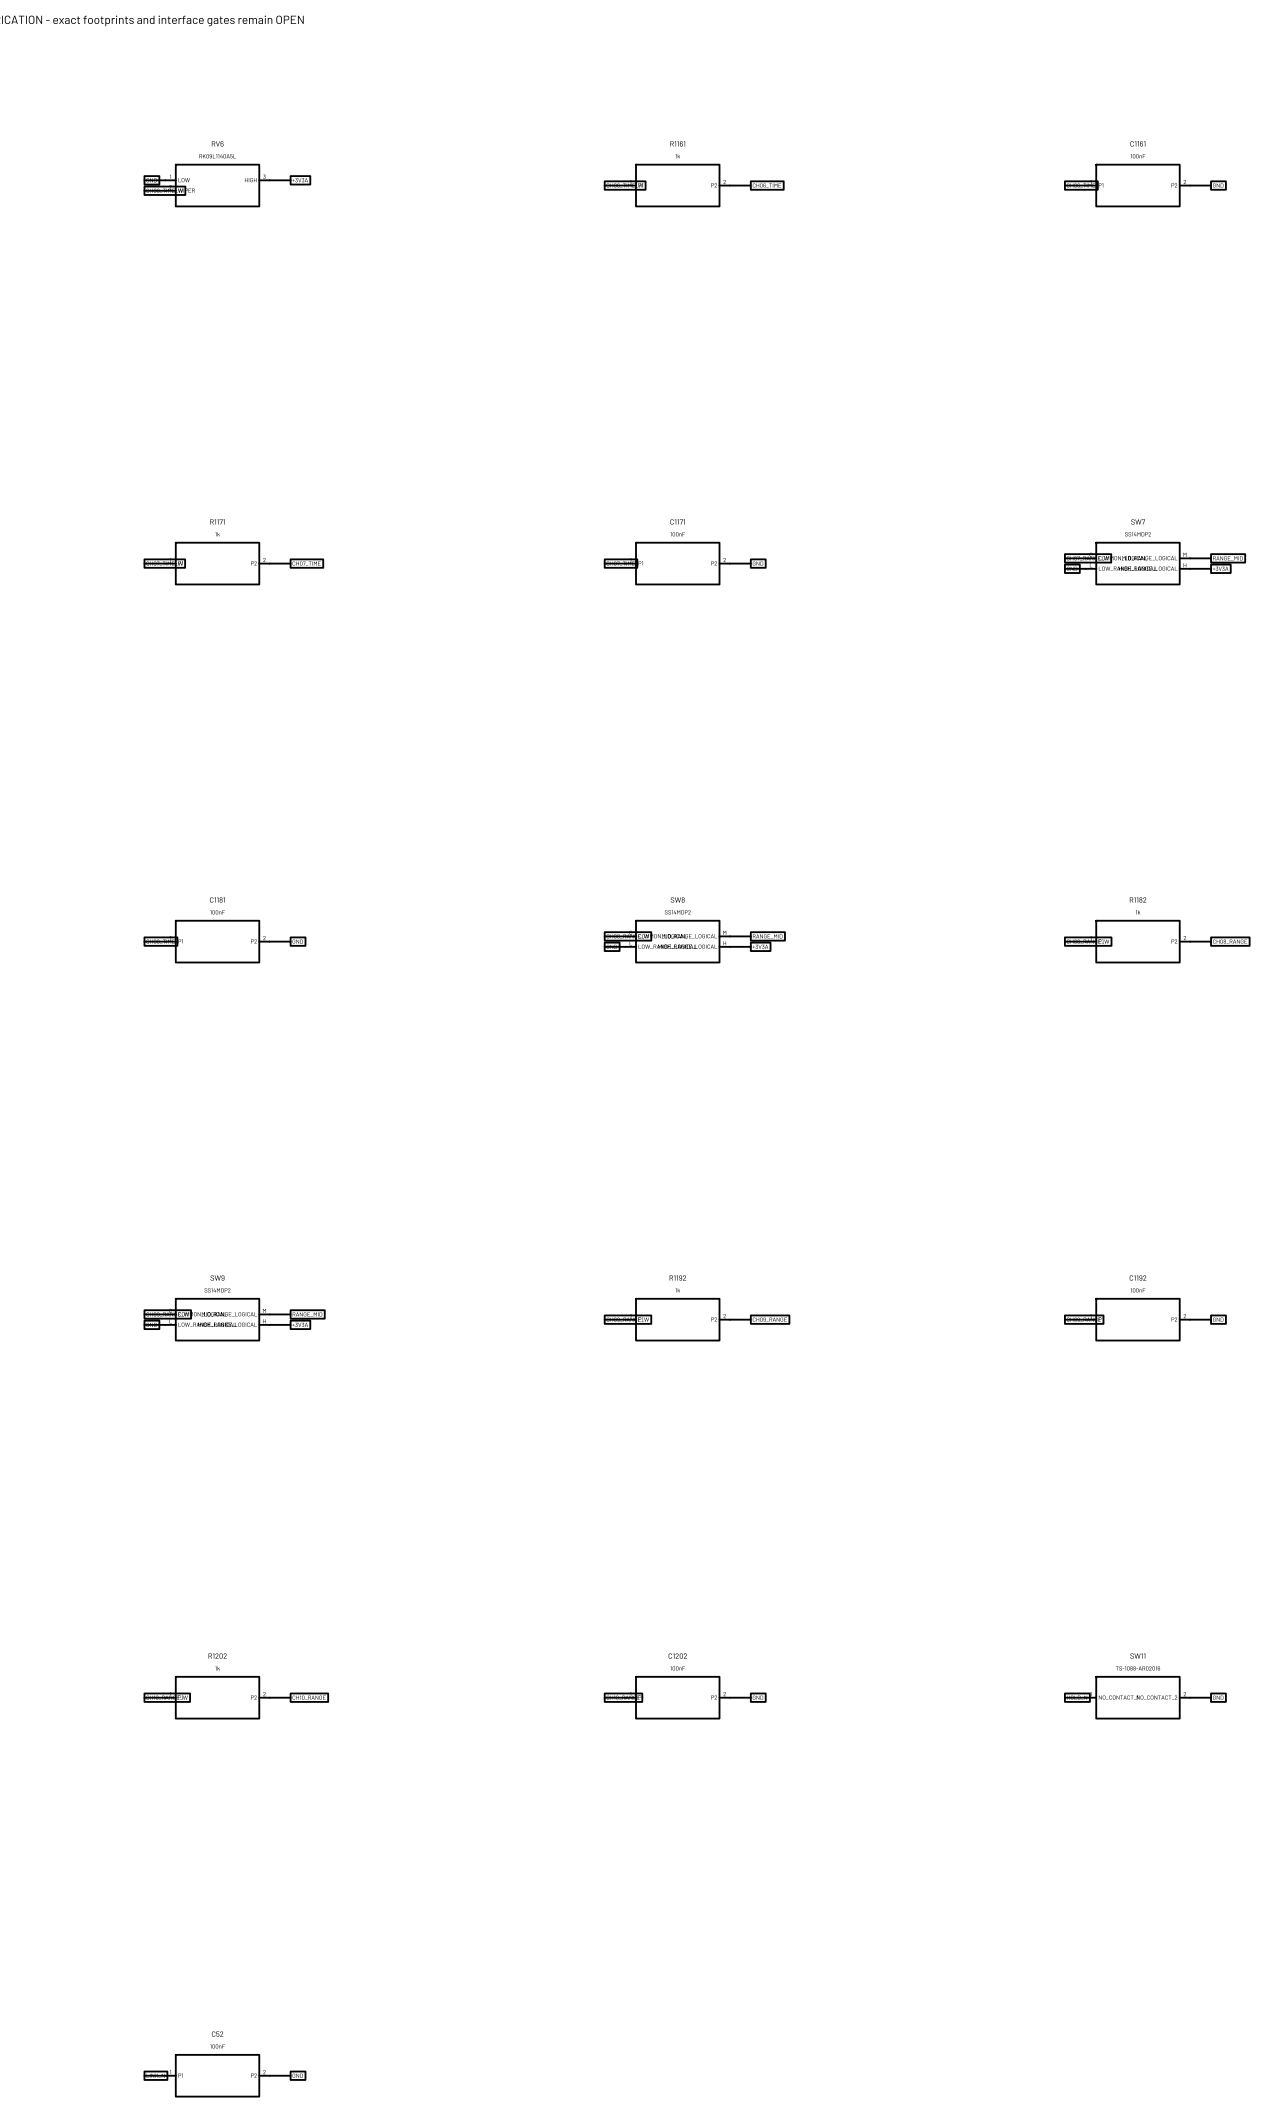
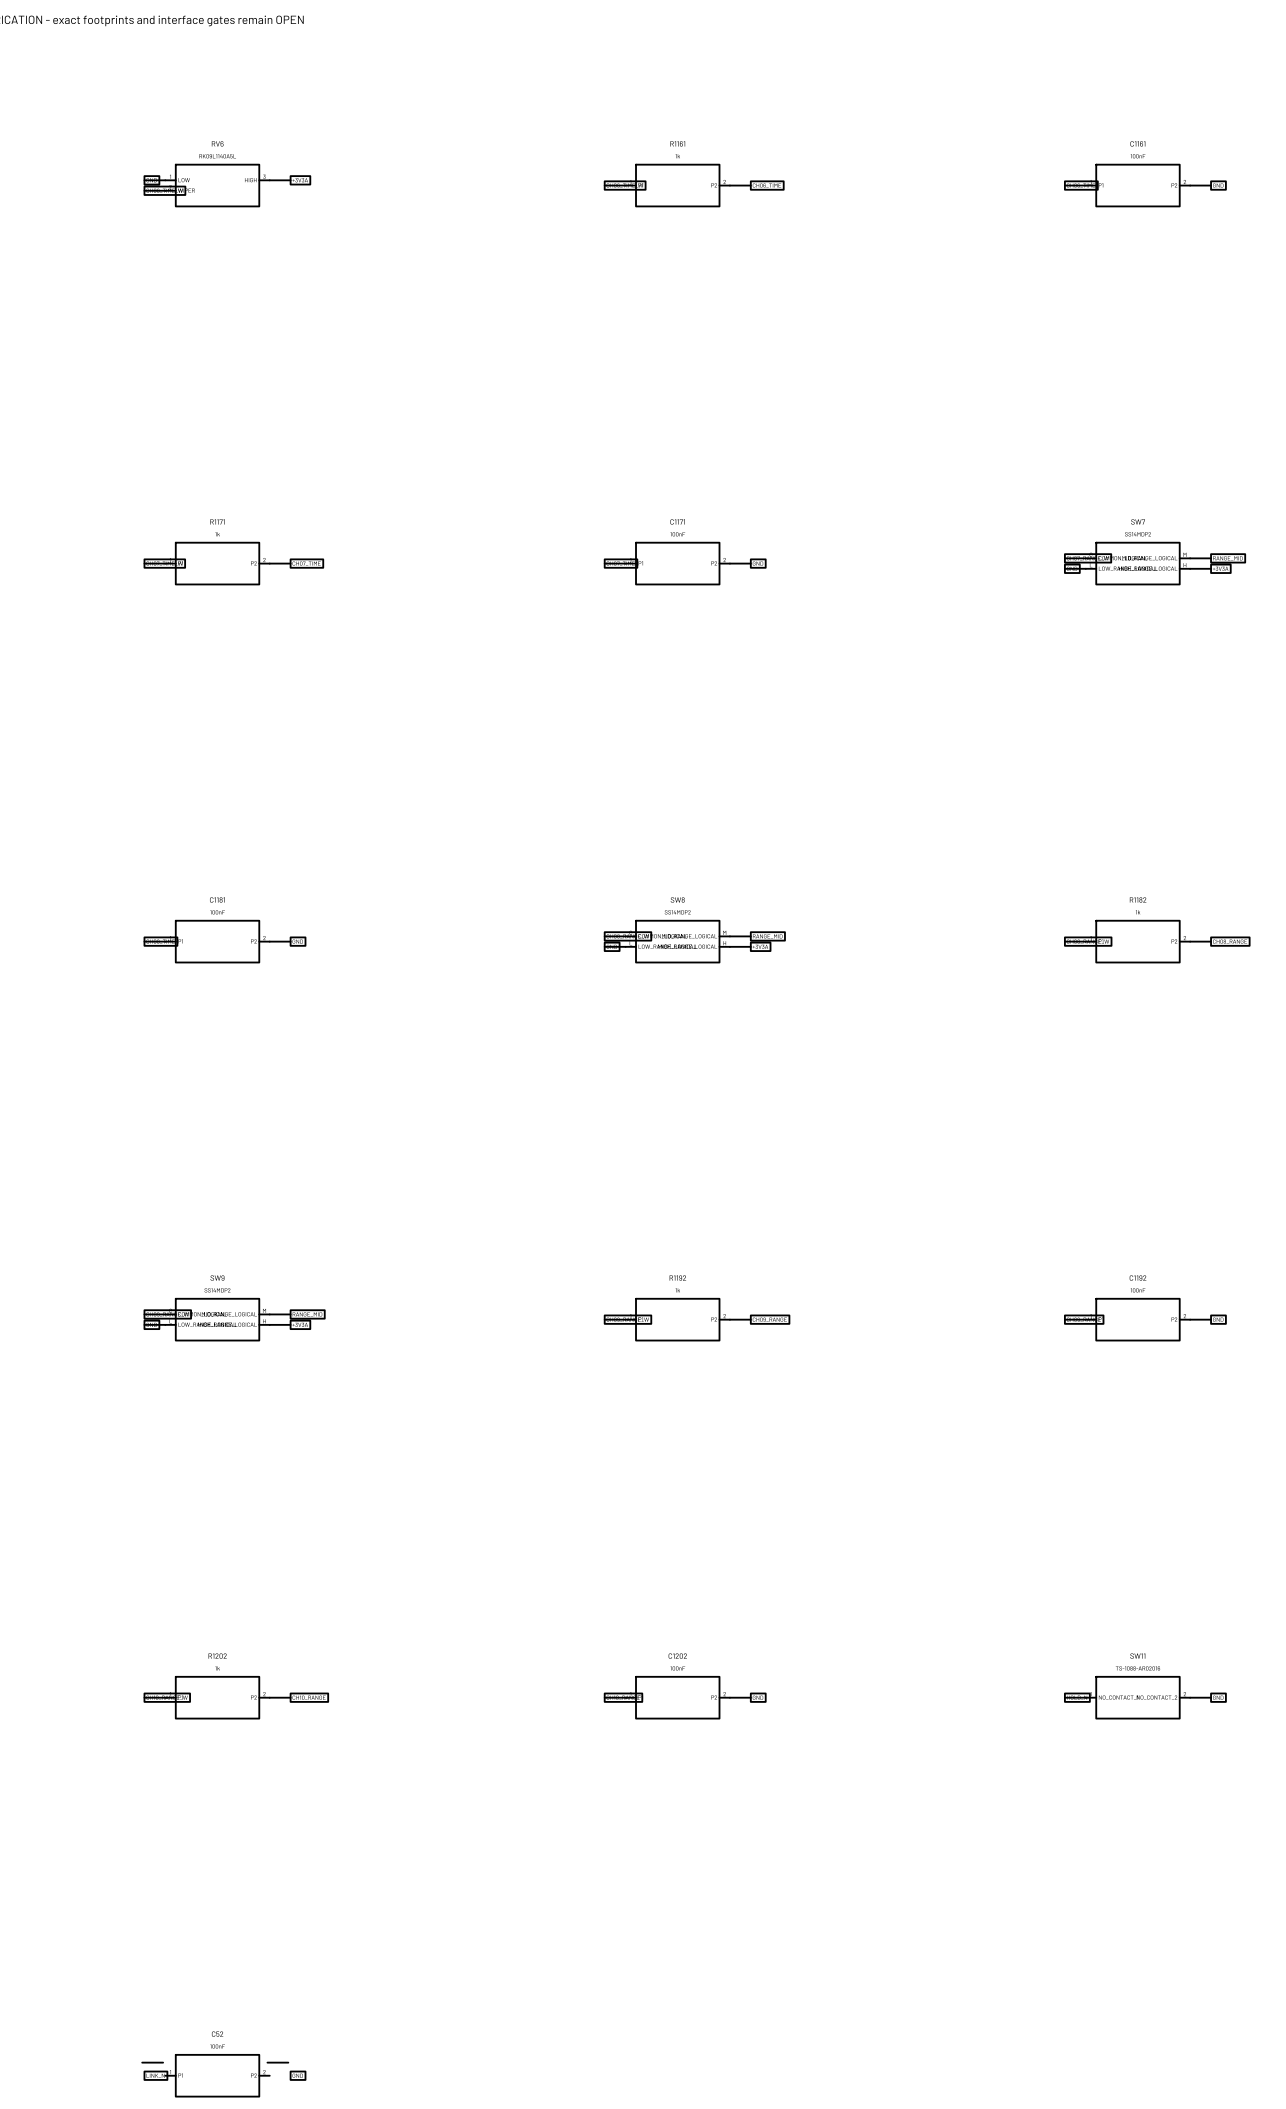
wire: (144, 2075) (165, 2075) -> (142, 2062) (163, 2062)
wire: (269, 2075) (290, 2075) -> (267, 2062) (288, 2062)

